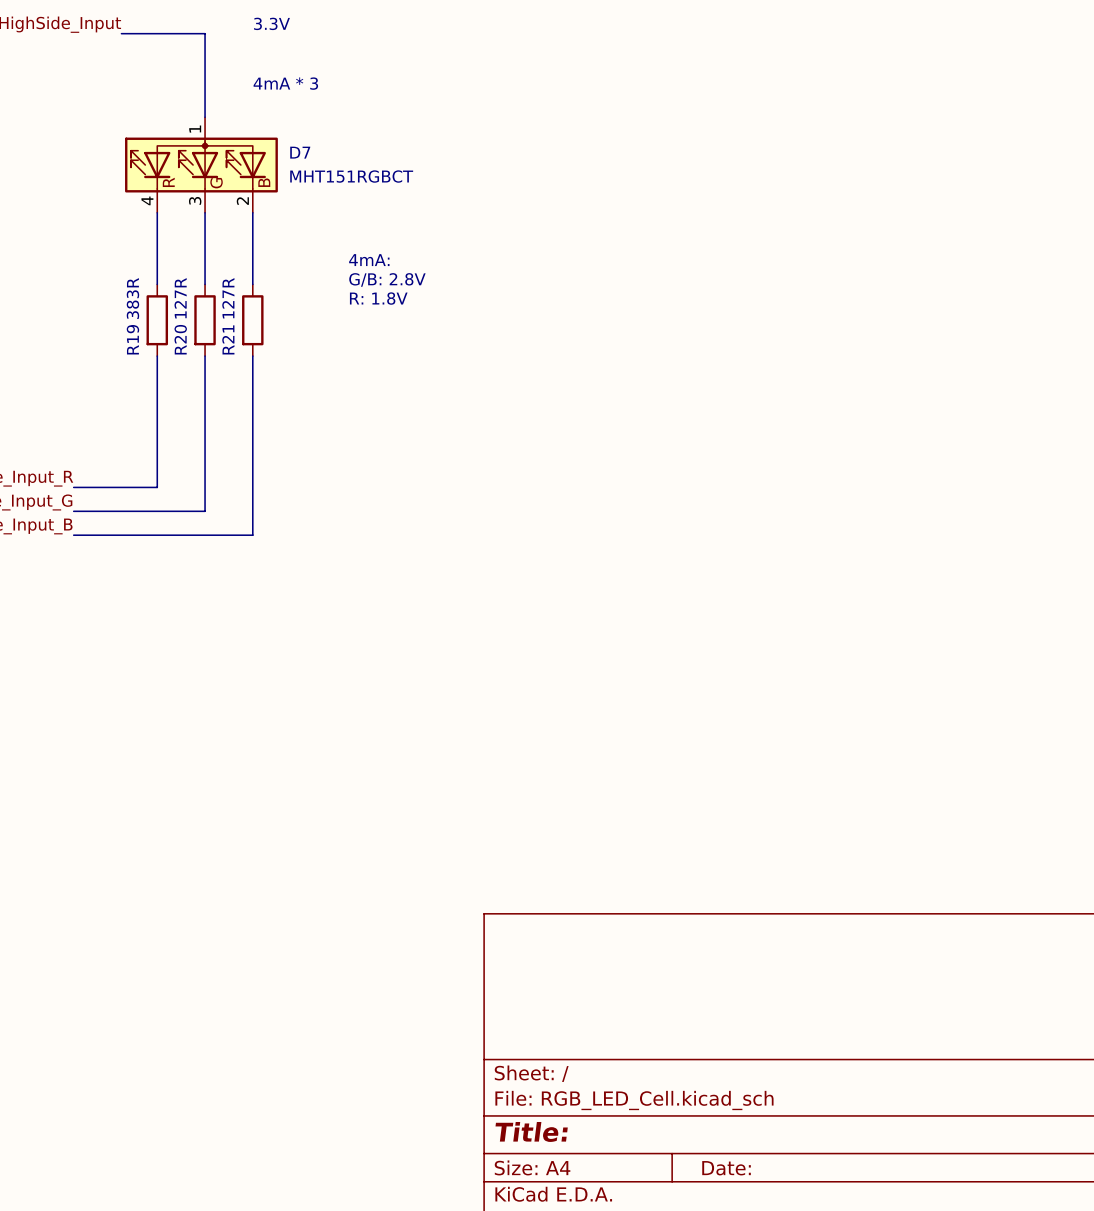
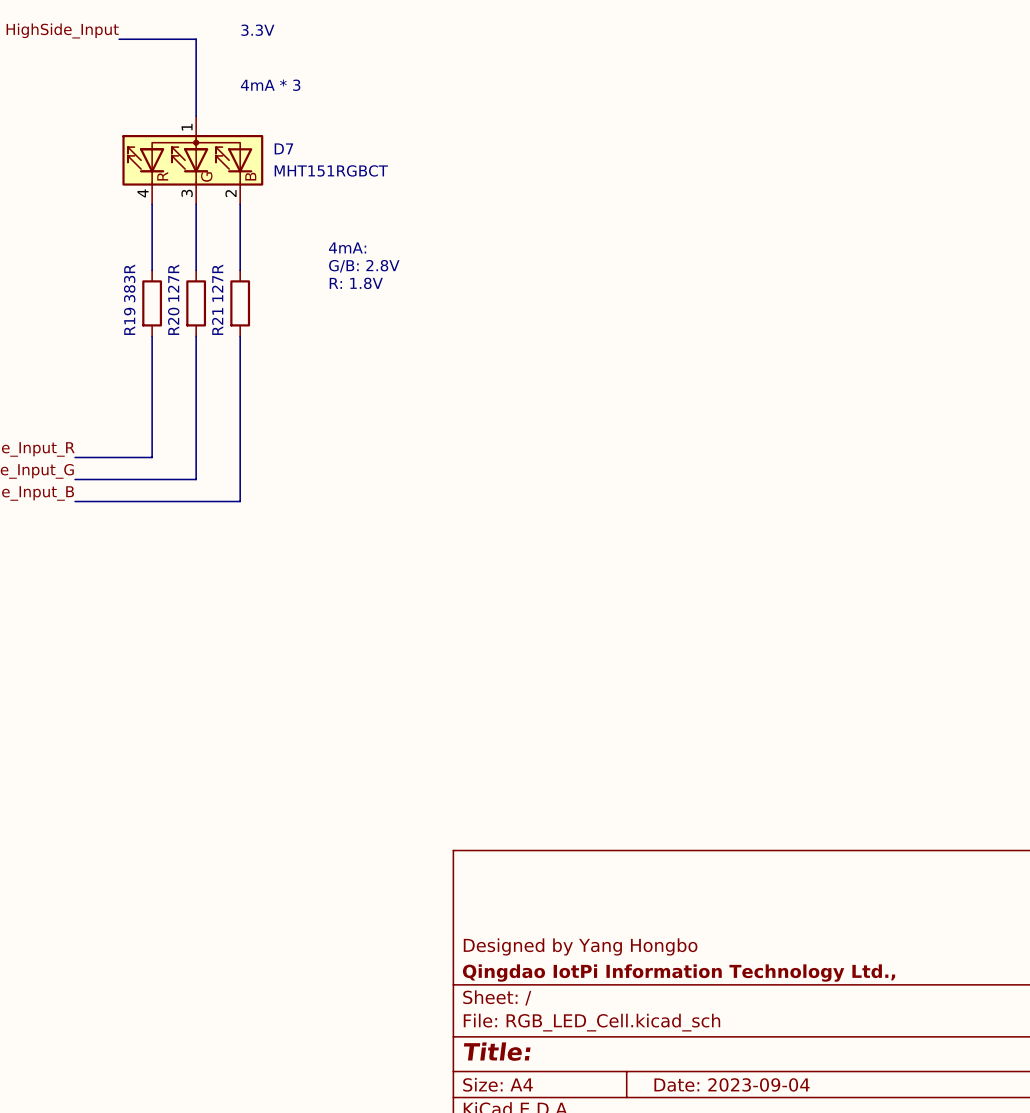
title block: none -> Designed by Yang Hongbo (580, 946)
title block: none -> Qingdao IotPi Information Technology Ltd., (679, 973)
title block: Date: (726, 1168) -> Date: 2023-09-04 (732, 1084)

